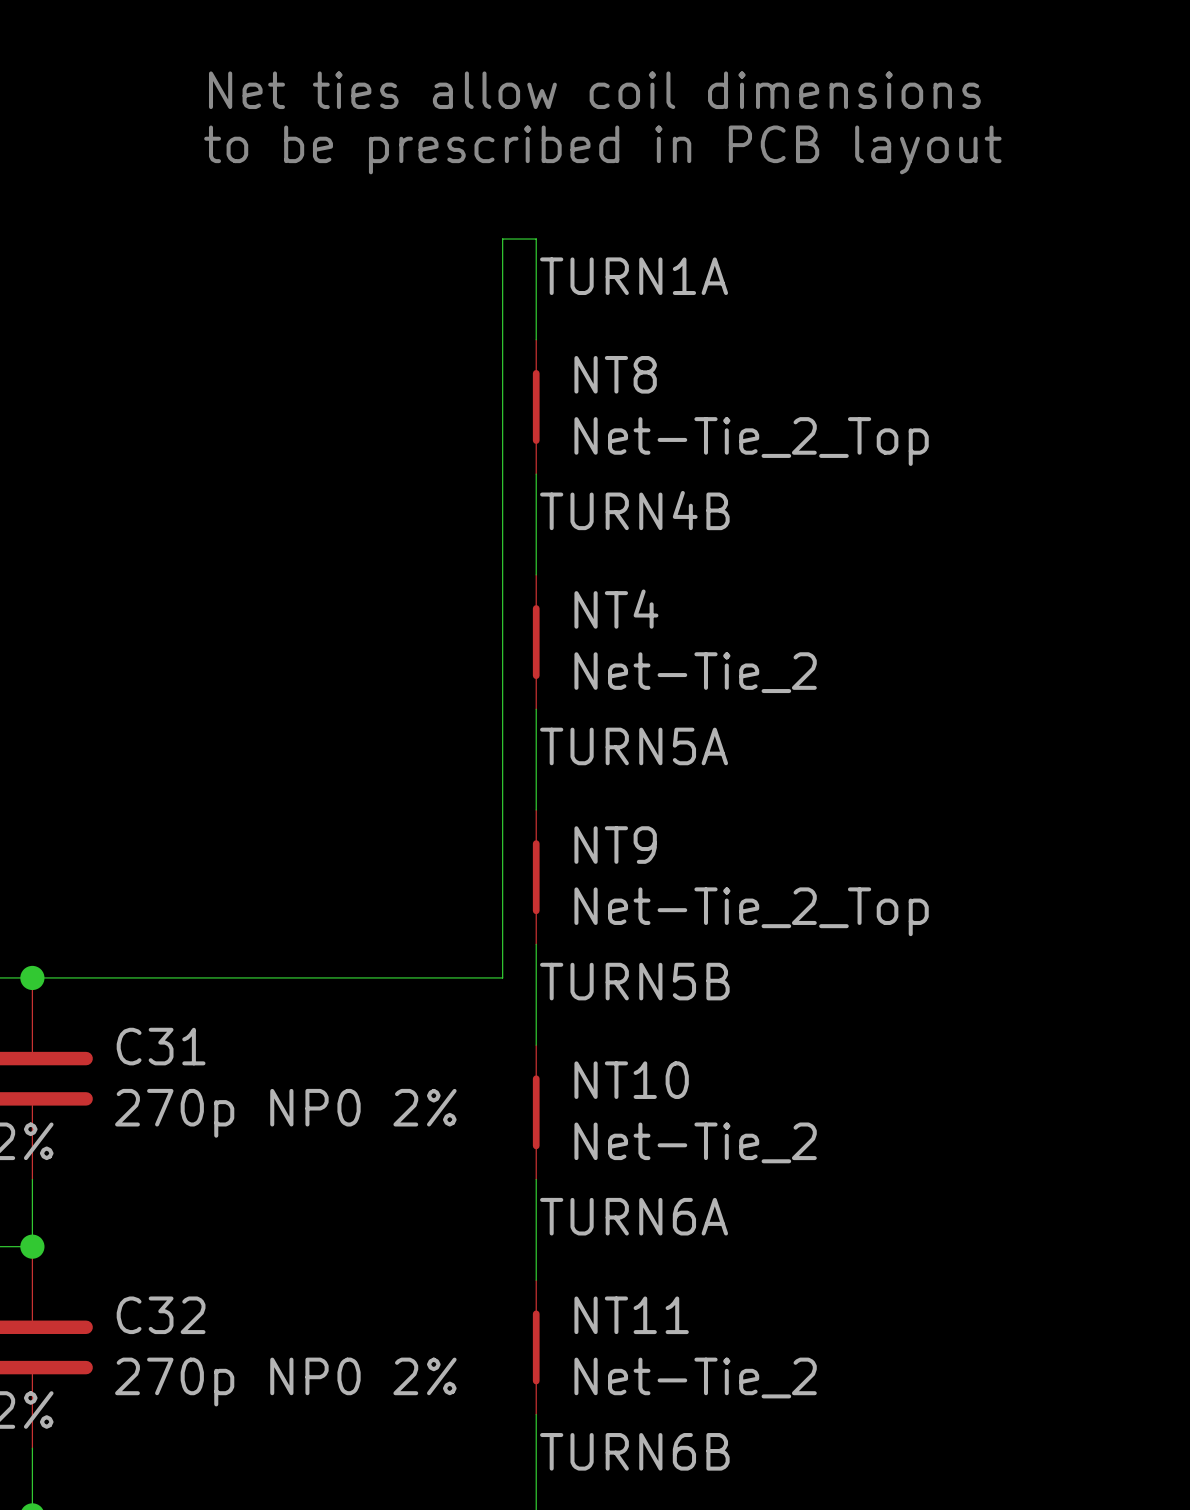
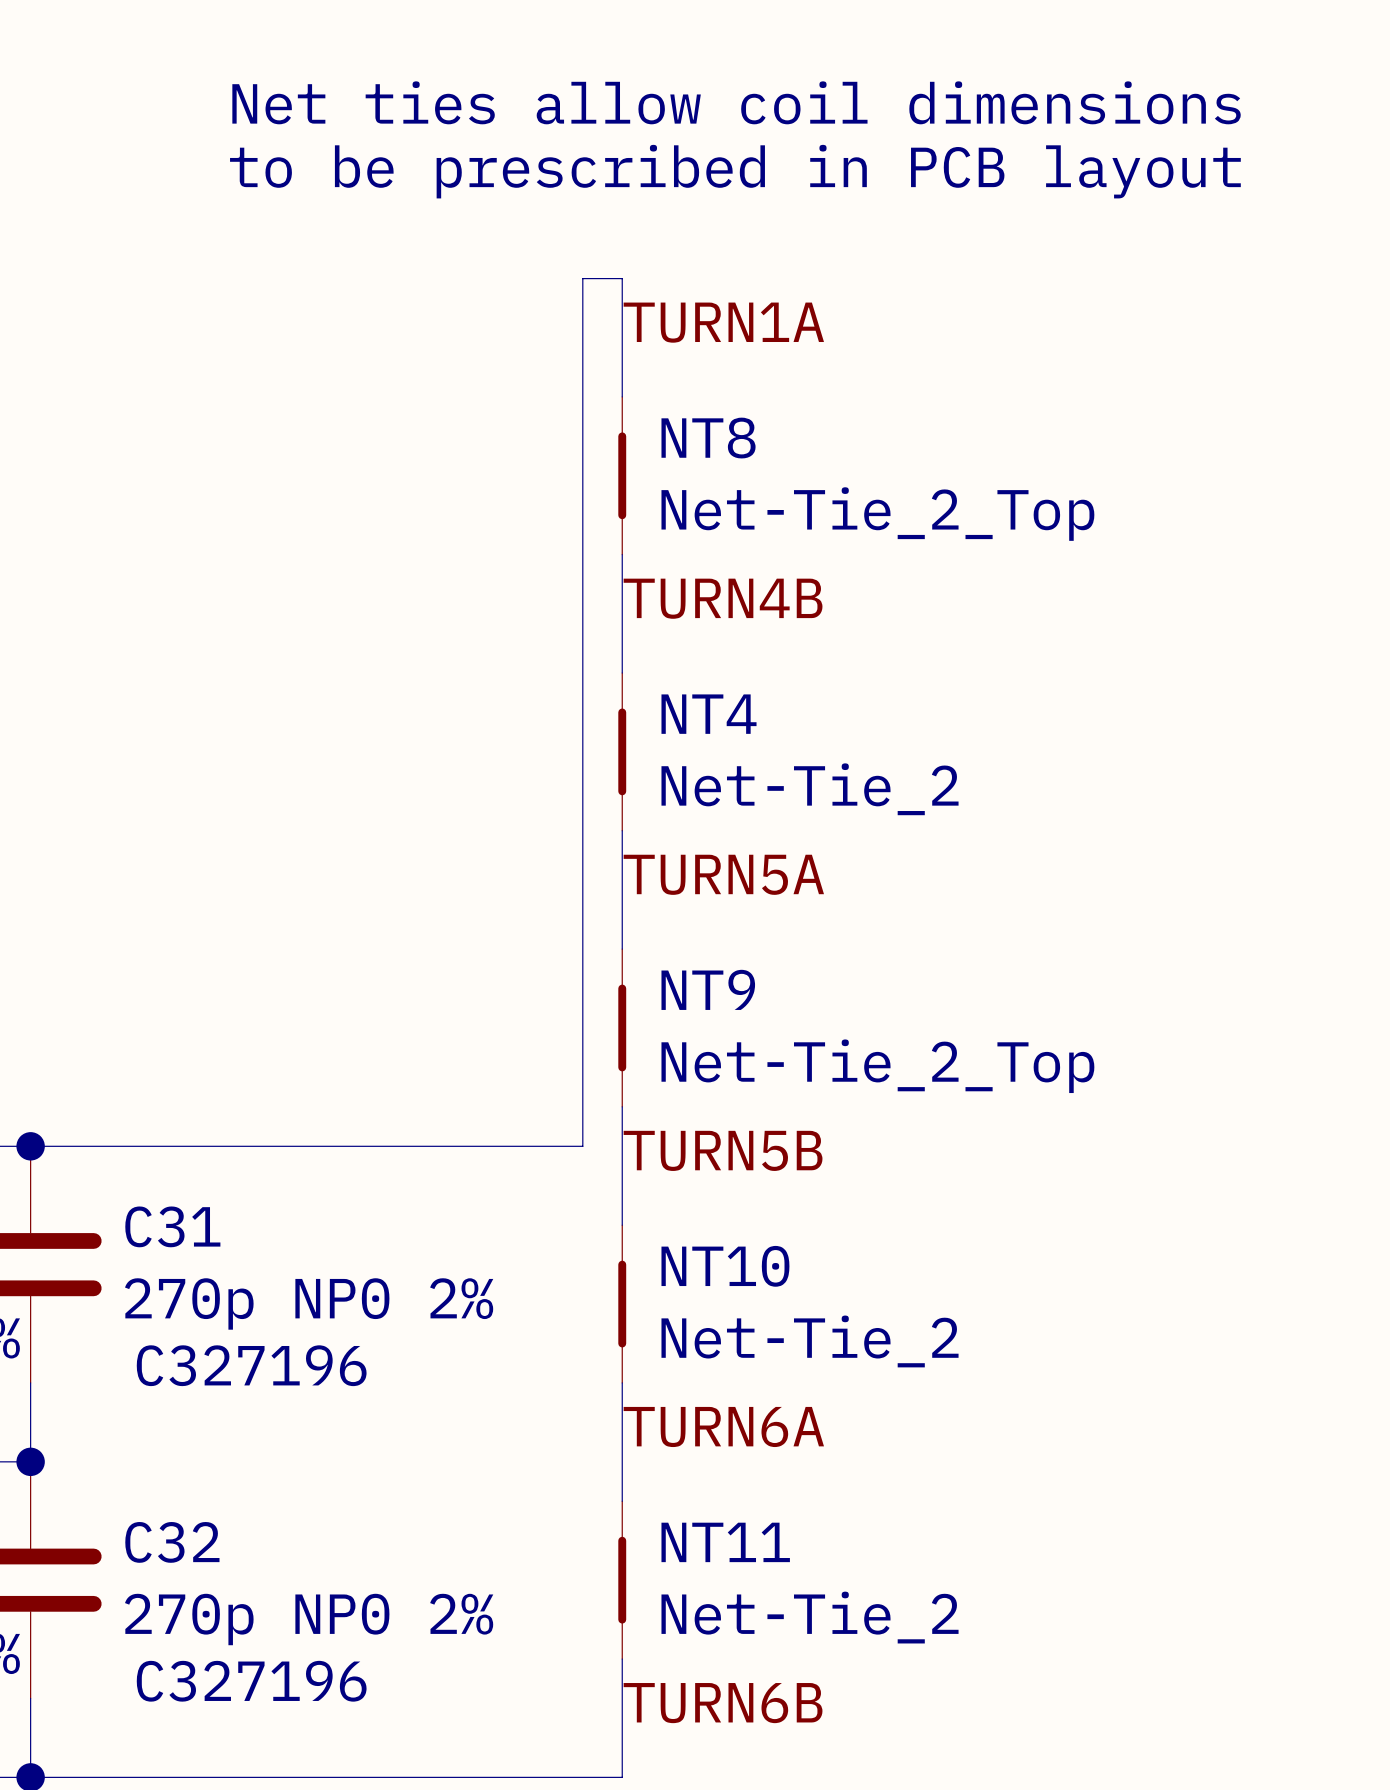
C31 text: none -> C327196 (251, 1365)
C32 text: none -> C327196 (251, 1681)

